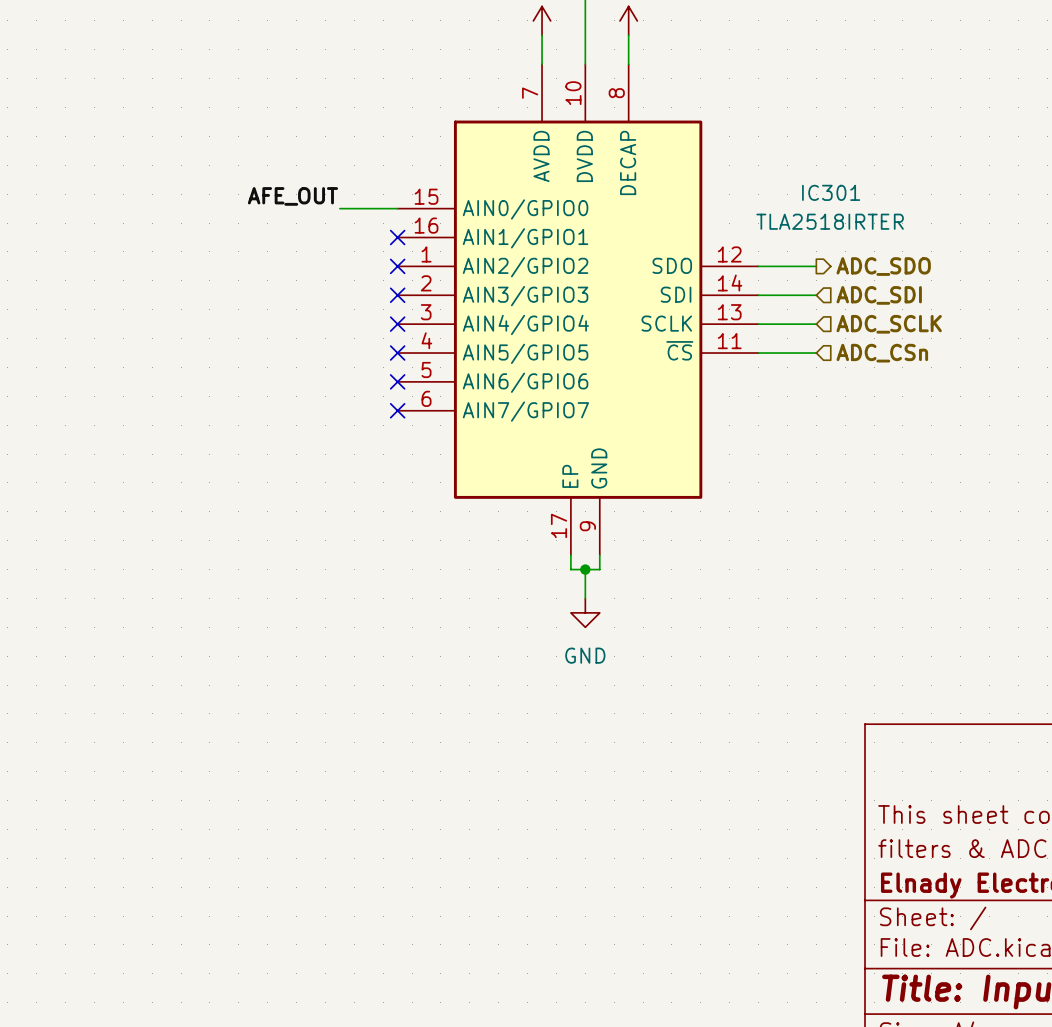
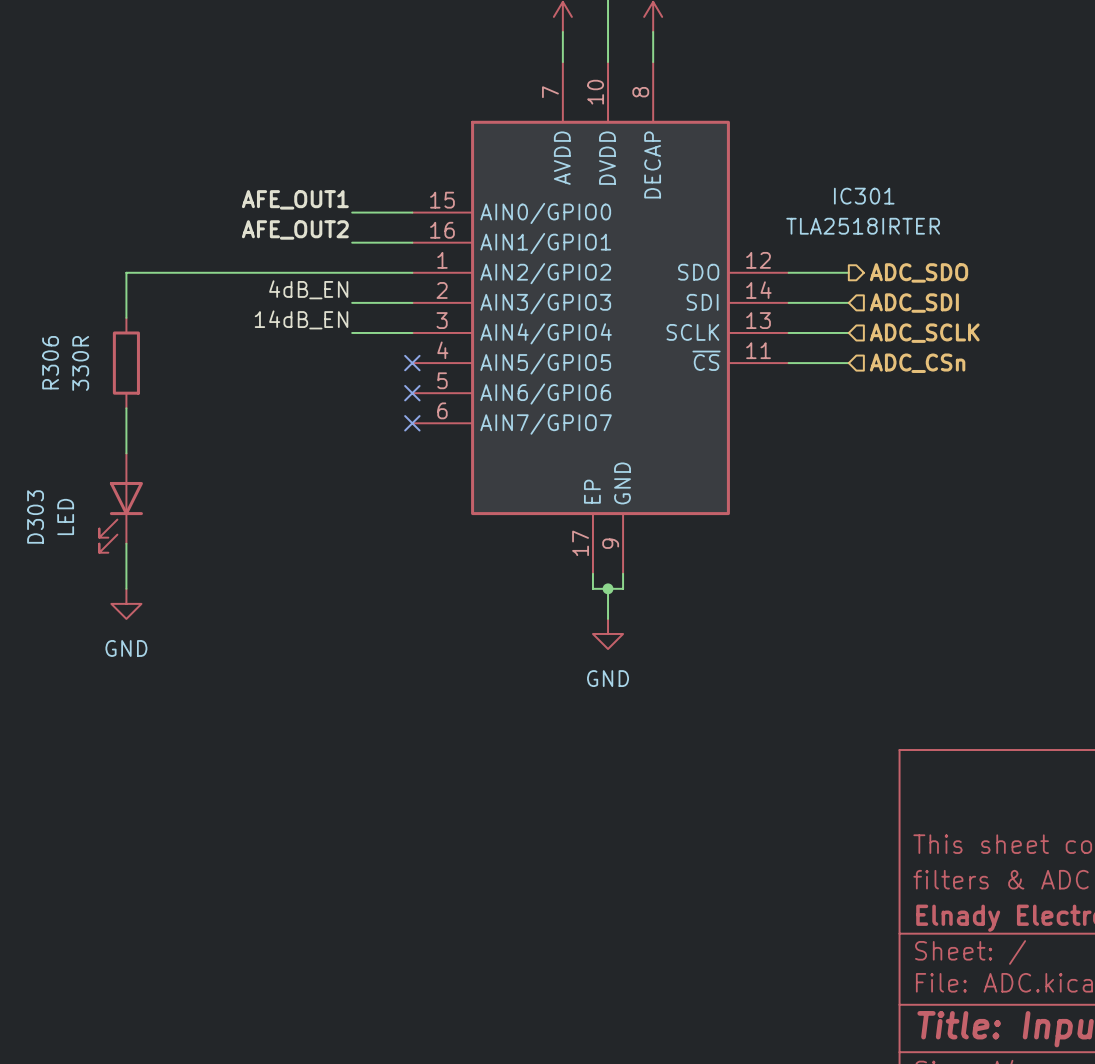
label: AFE_OUT (292, 196) -> AFE_OUT1 (295, 199)
label: none -> AFE_OUT2 (295, 229)
wire: none -> (352, 242) (412, 242)
no-connect mark: (397, 237) -> none
wire: none -> (412, 272) (126, 272) (126, 317)
no-connect mark: (397, 266) -> none
label: none -> 4dB_EN (308, 289)
wire: none -> (352, 302) (412, 302)
no-connect mark: (397, 295) -> none
label: none -> 14dB_EN (301, 319)
wire: none -> (352, 332) (412, 332)
no-connect mark: (397, 324) -> none
R306: none -> 330R (126, 363)
wire: none -> (126, 408) (126, 453)
D303: none -> LED (121, 503)
wire: none -> (126, 543) (126, 588)
power symbol: none -> GND (126, 603)

